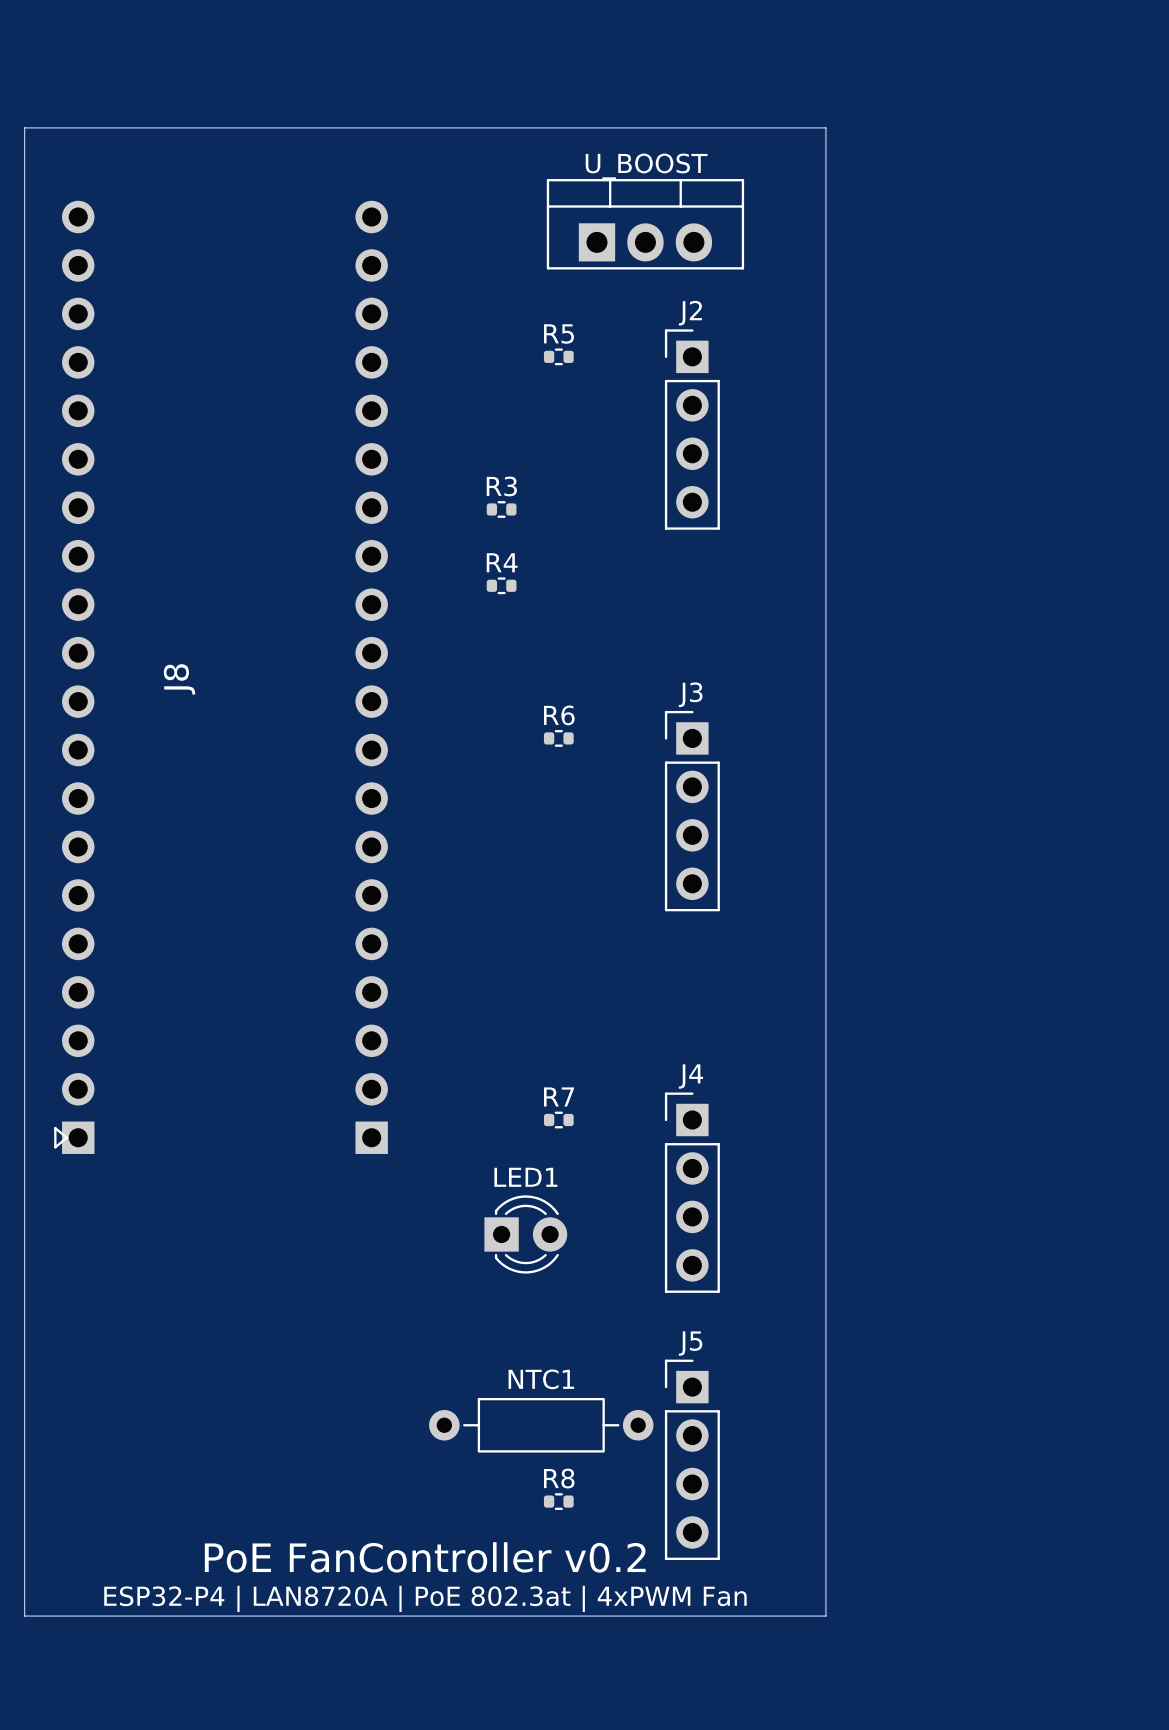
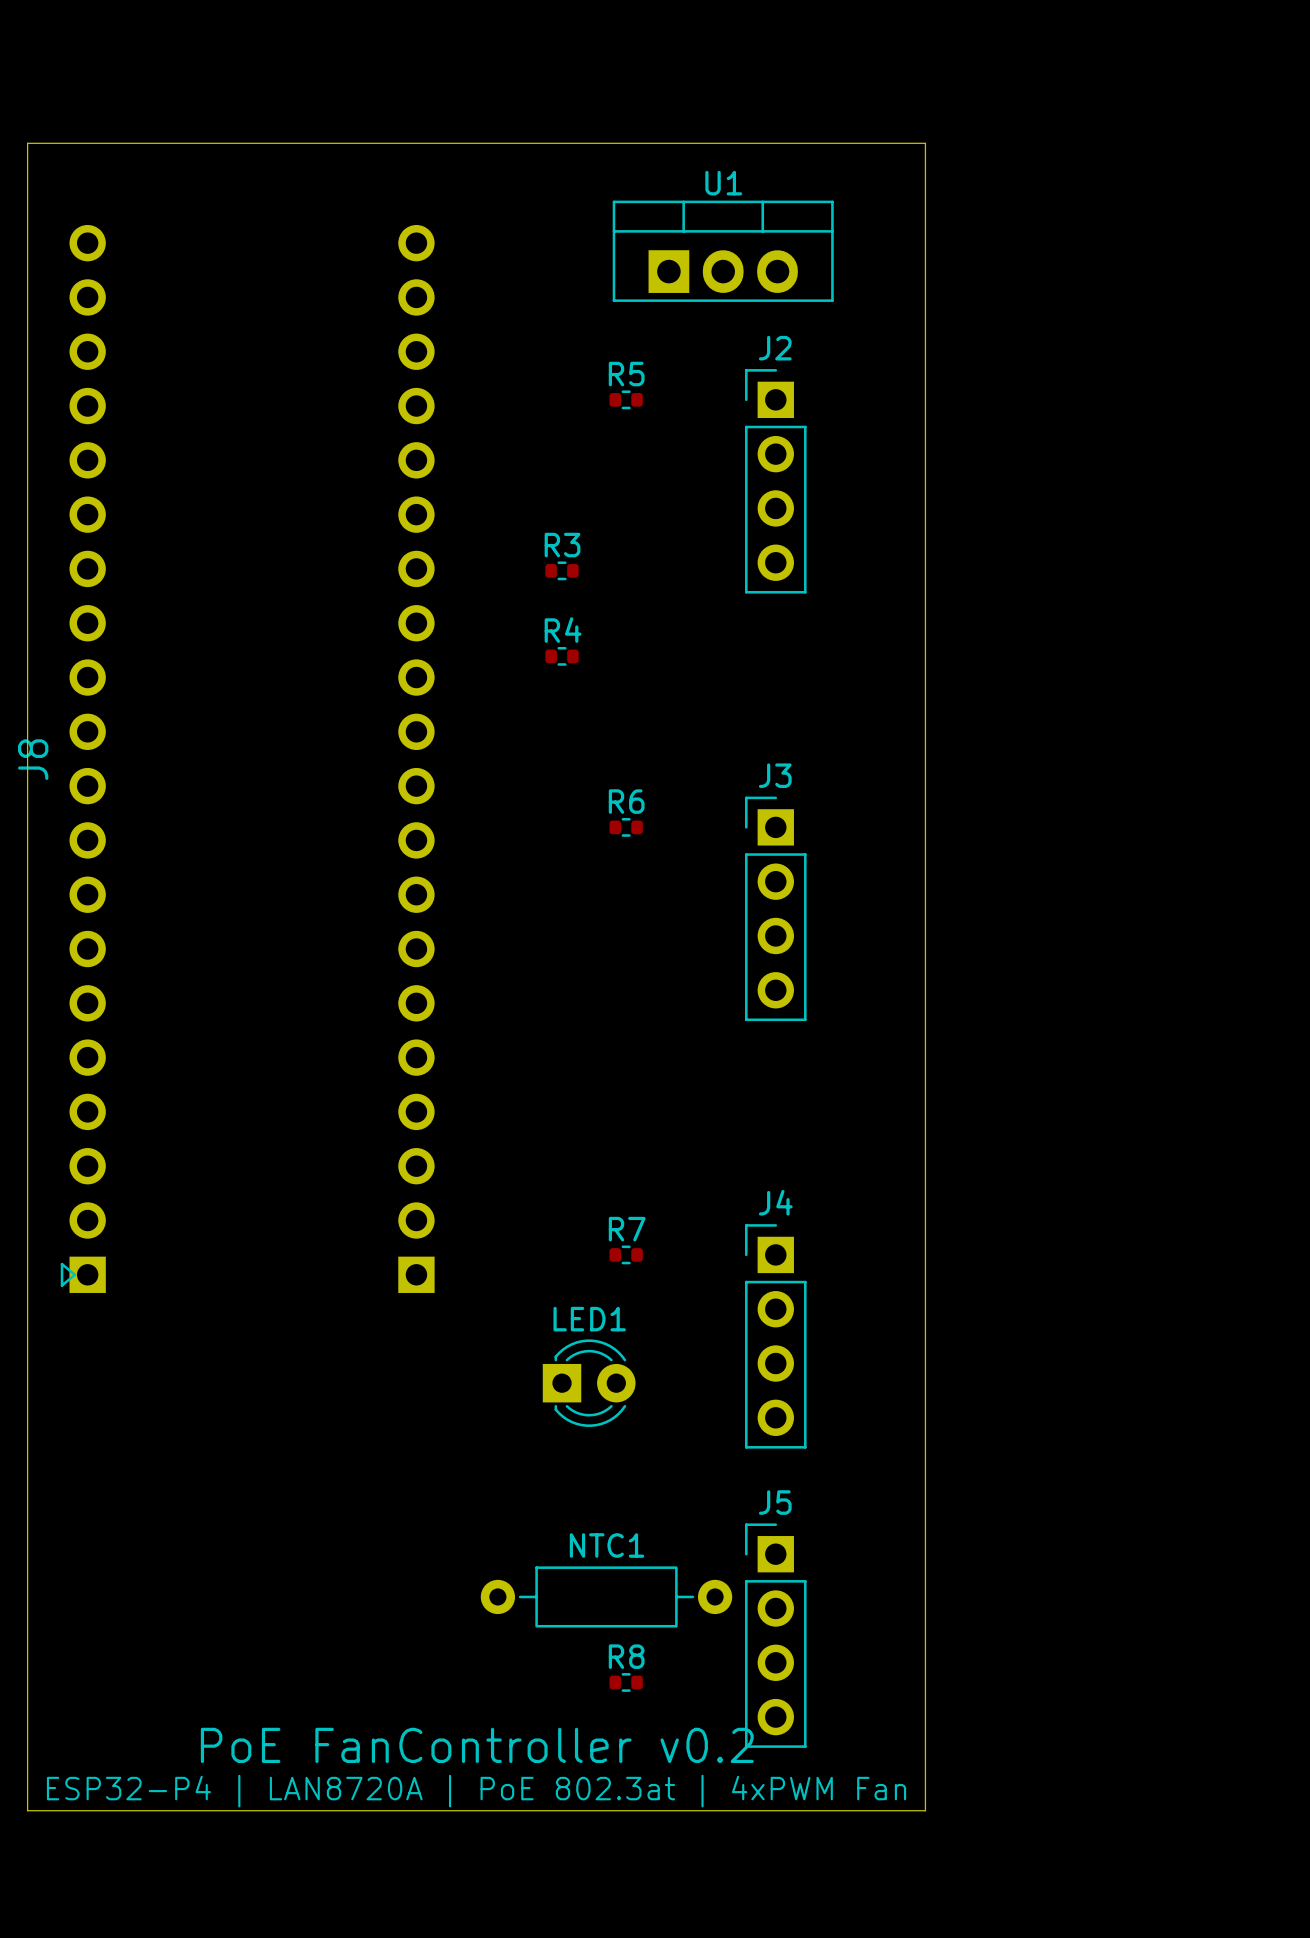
U_BOOST name: U_BOOST (646, 166) -> U1 (723, 183)
J8 name position: J8 (179, 679) -> J8 (33, 759)

